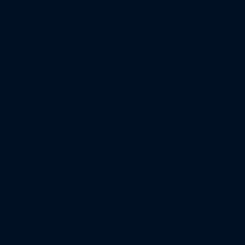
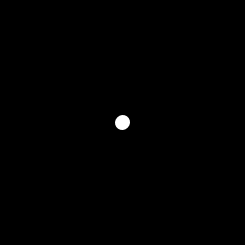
board edge: none -> (122, 122) (122, 122)

